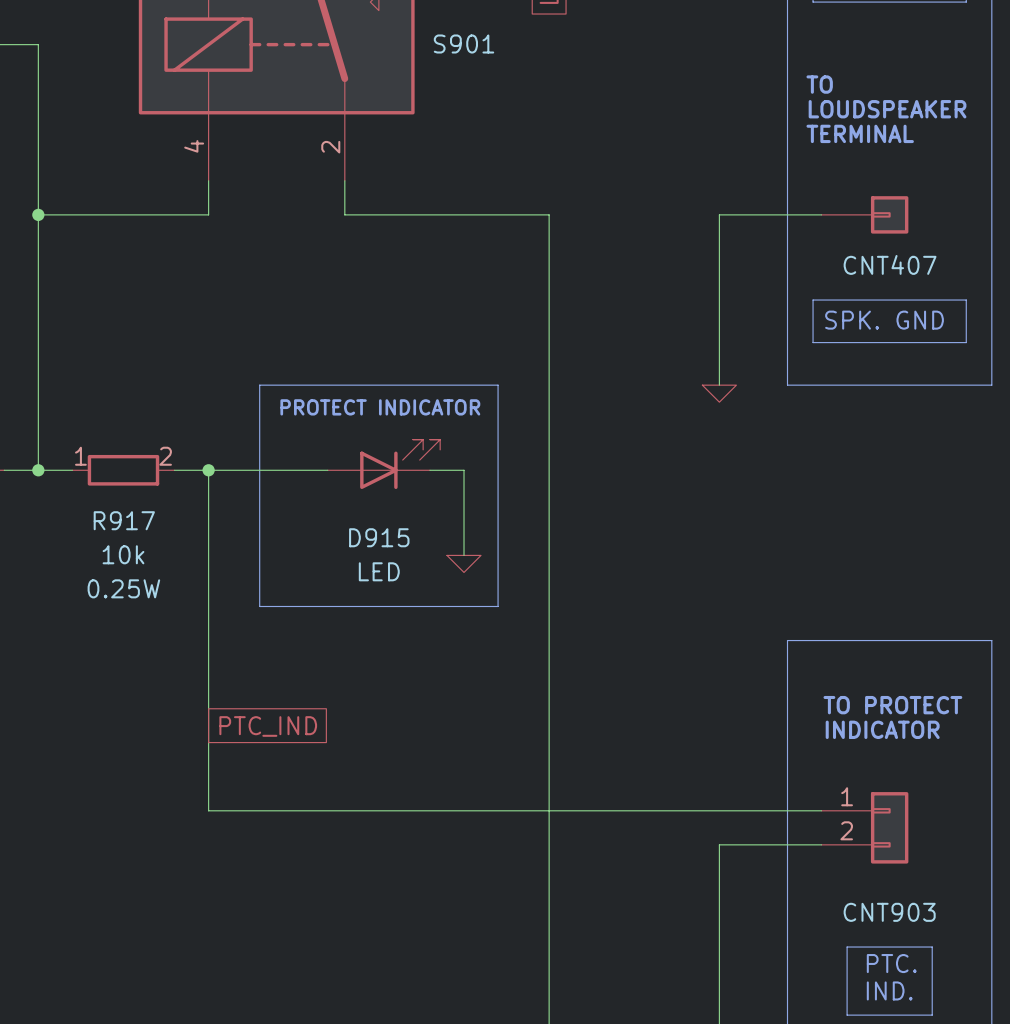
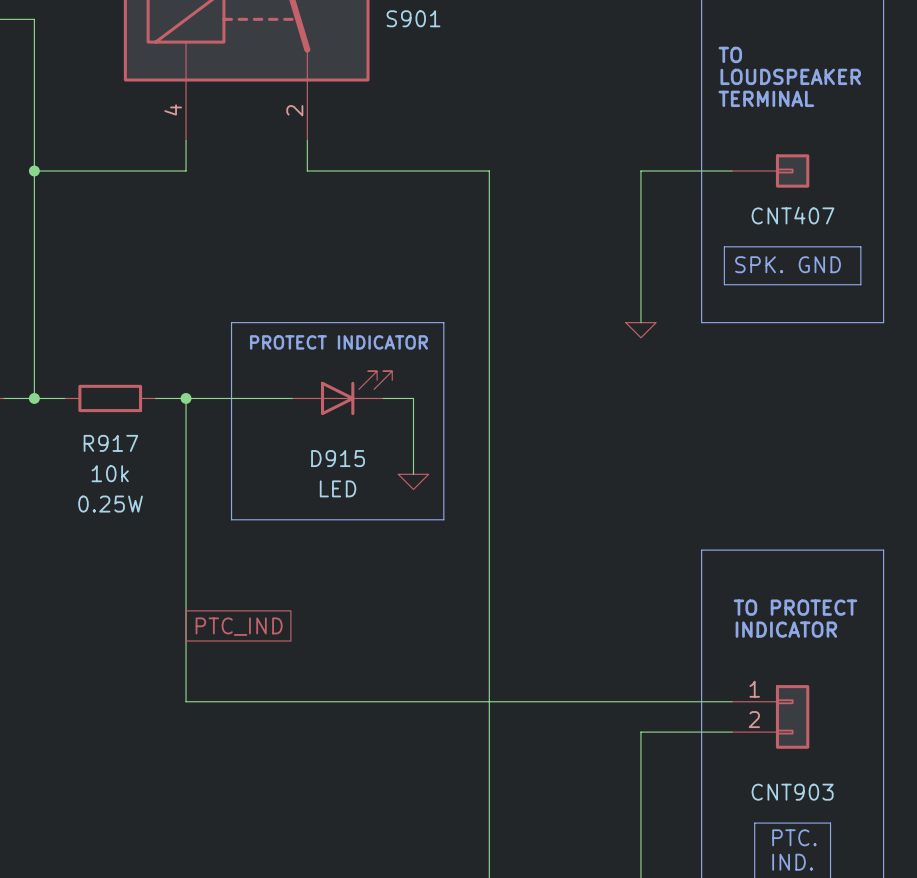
R917 pin number: 1 (80, 456) -> none
R917 pin number: 2 (165, 456) -> none

